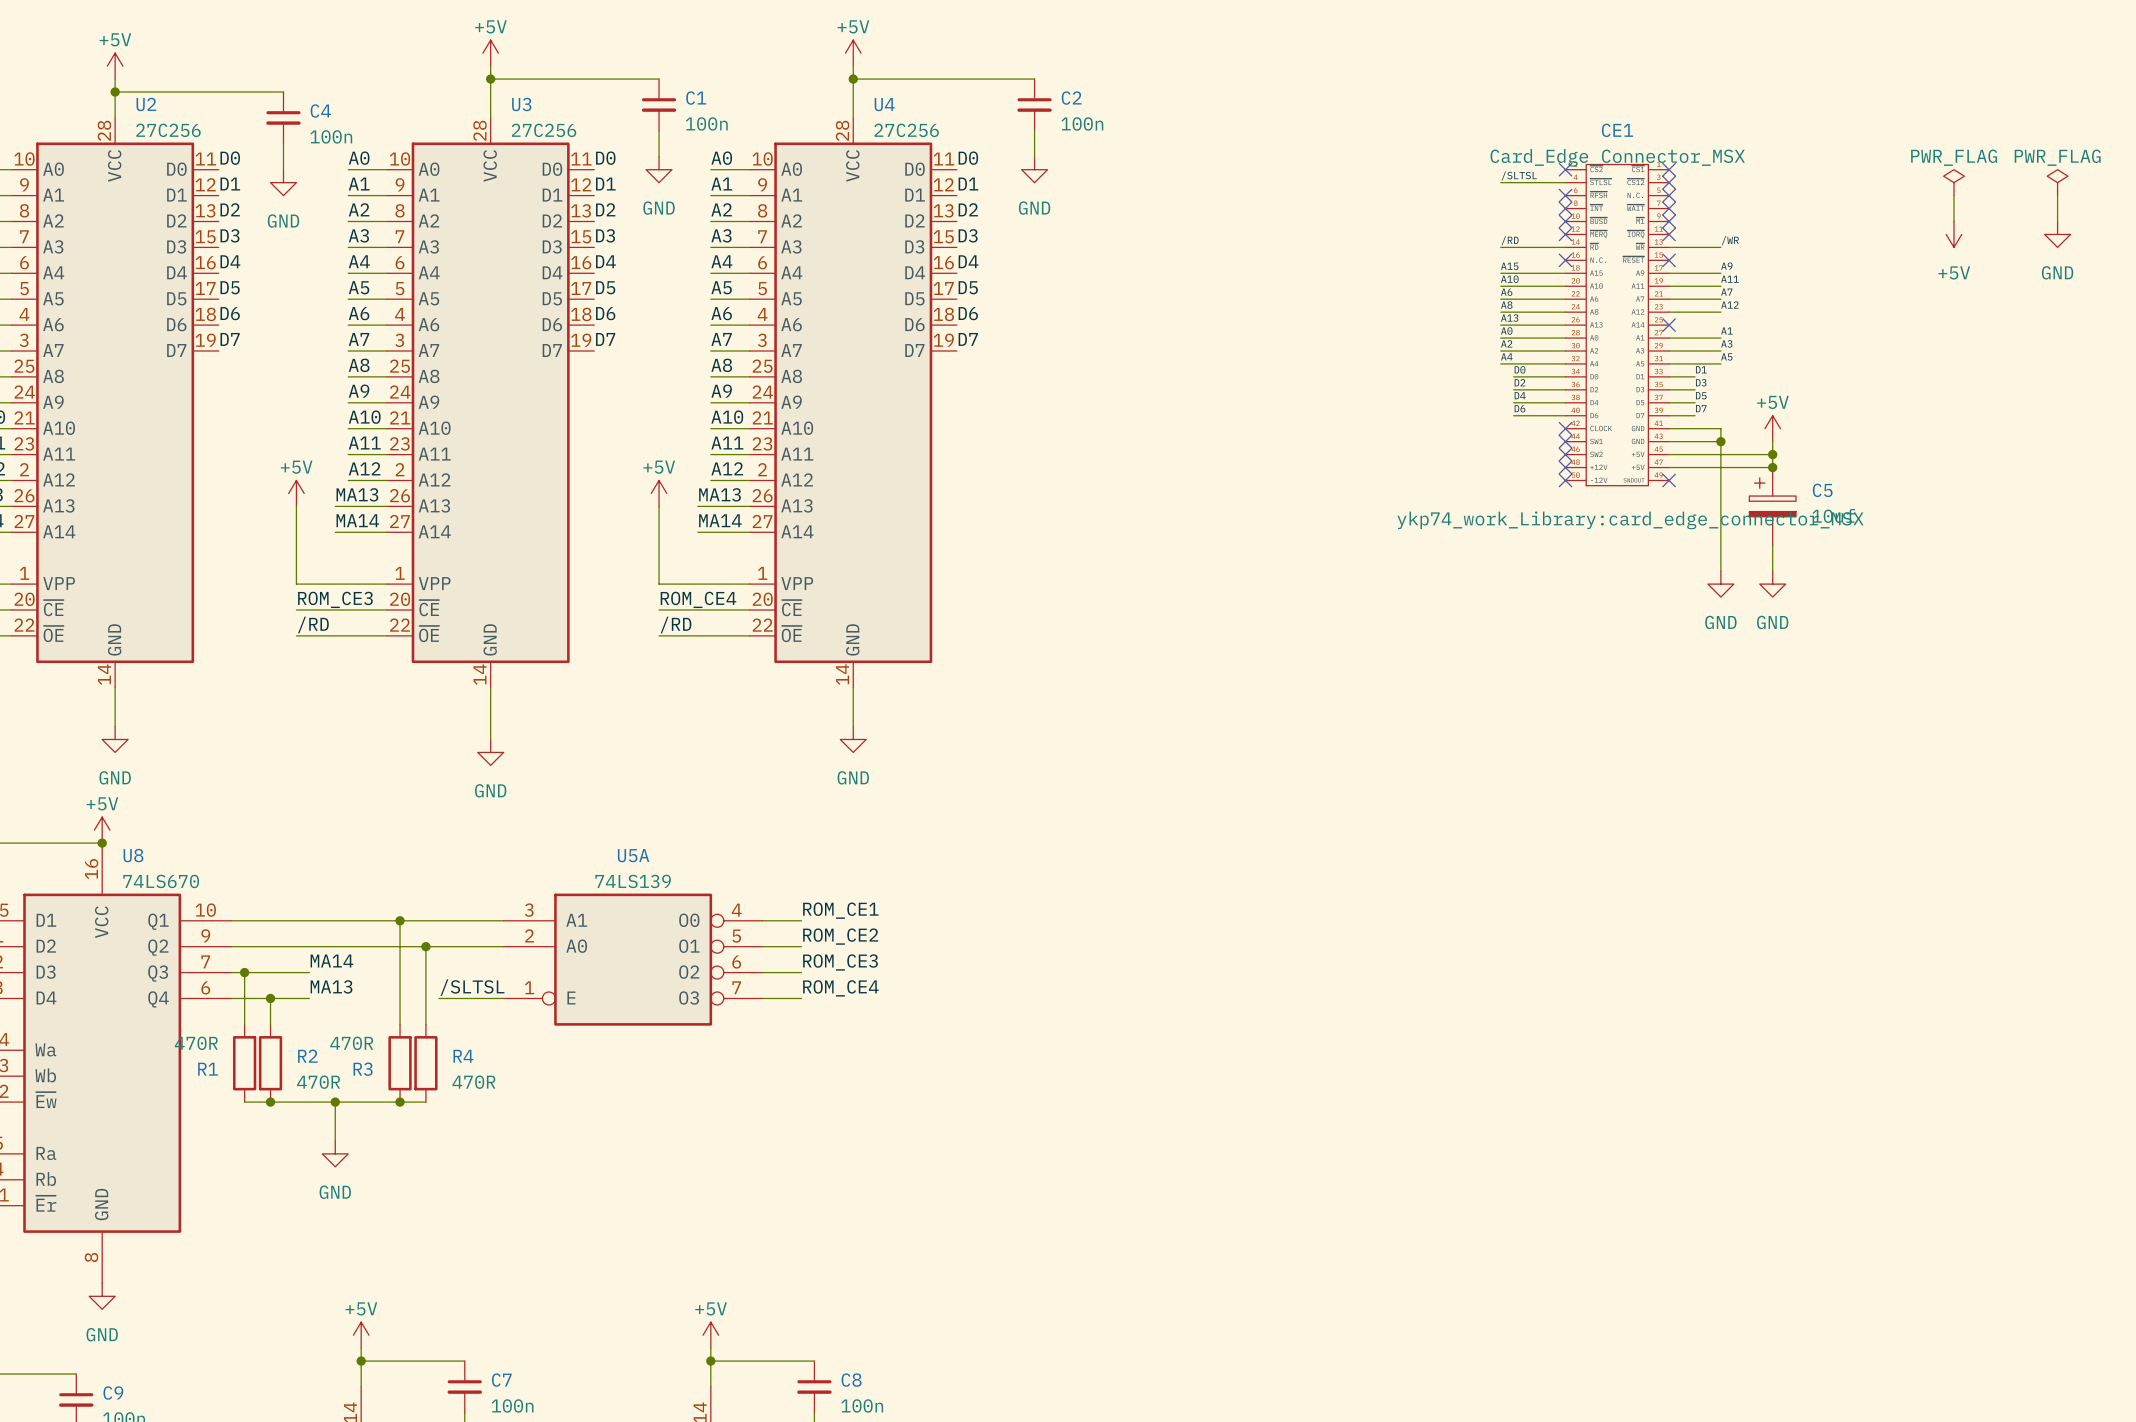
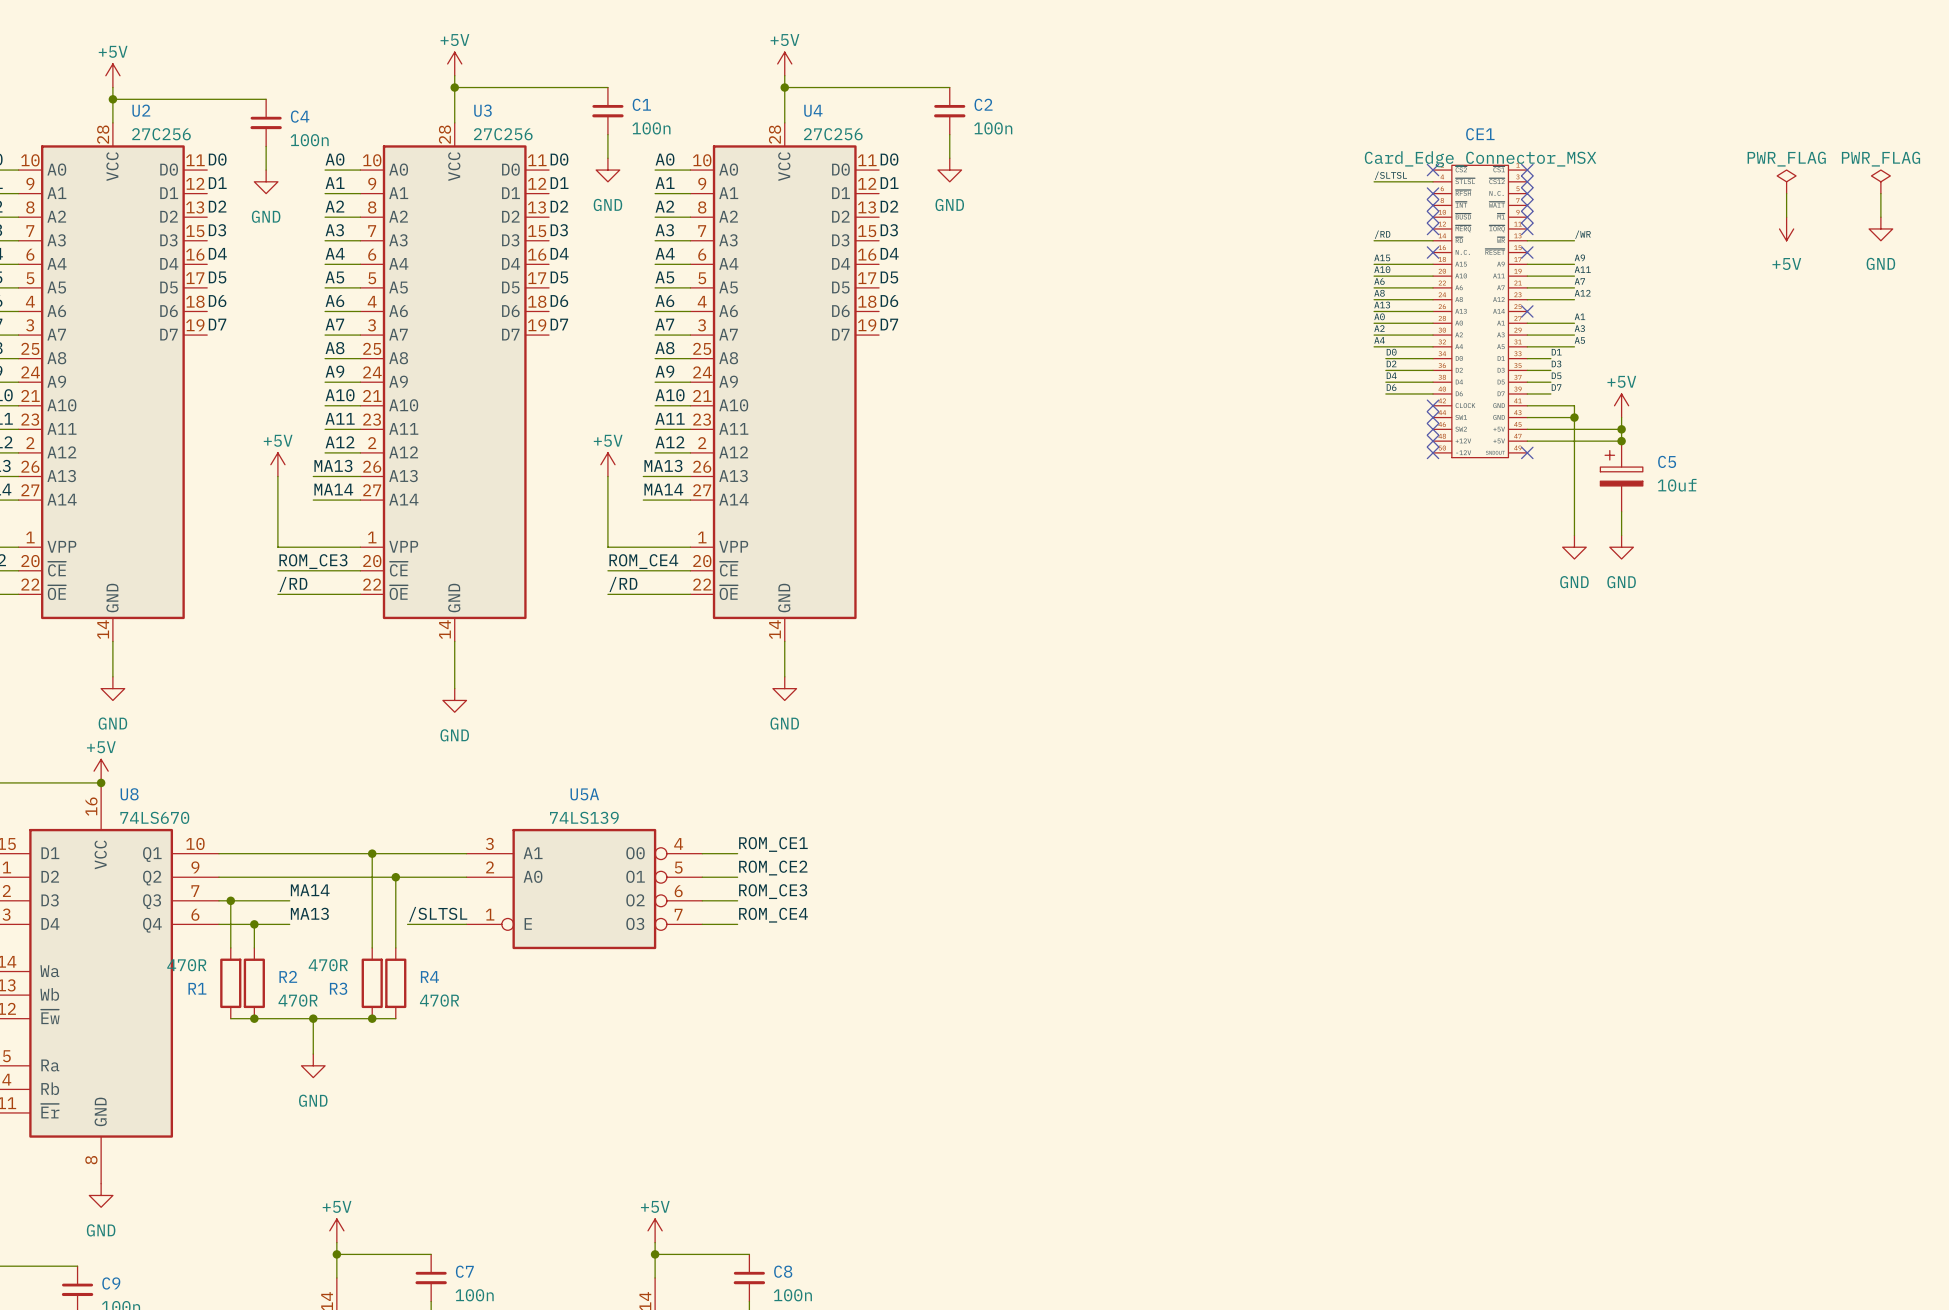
CE1 text: ykp74_work_Library:card_edge_connector_MSX (1630, 520) -> none

